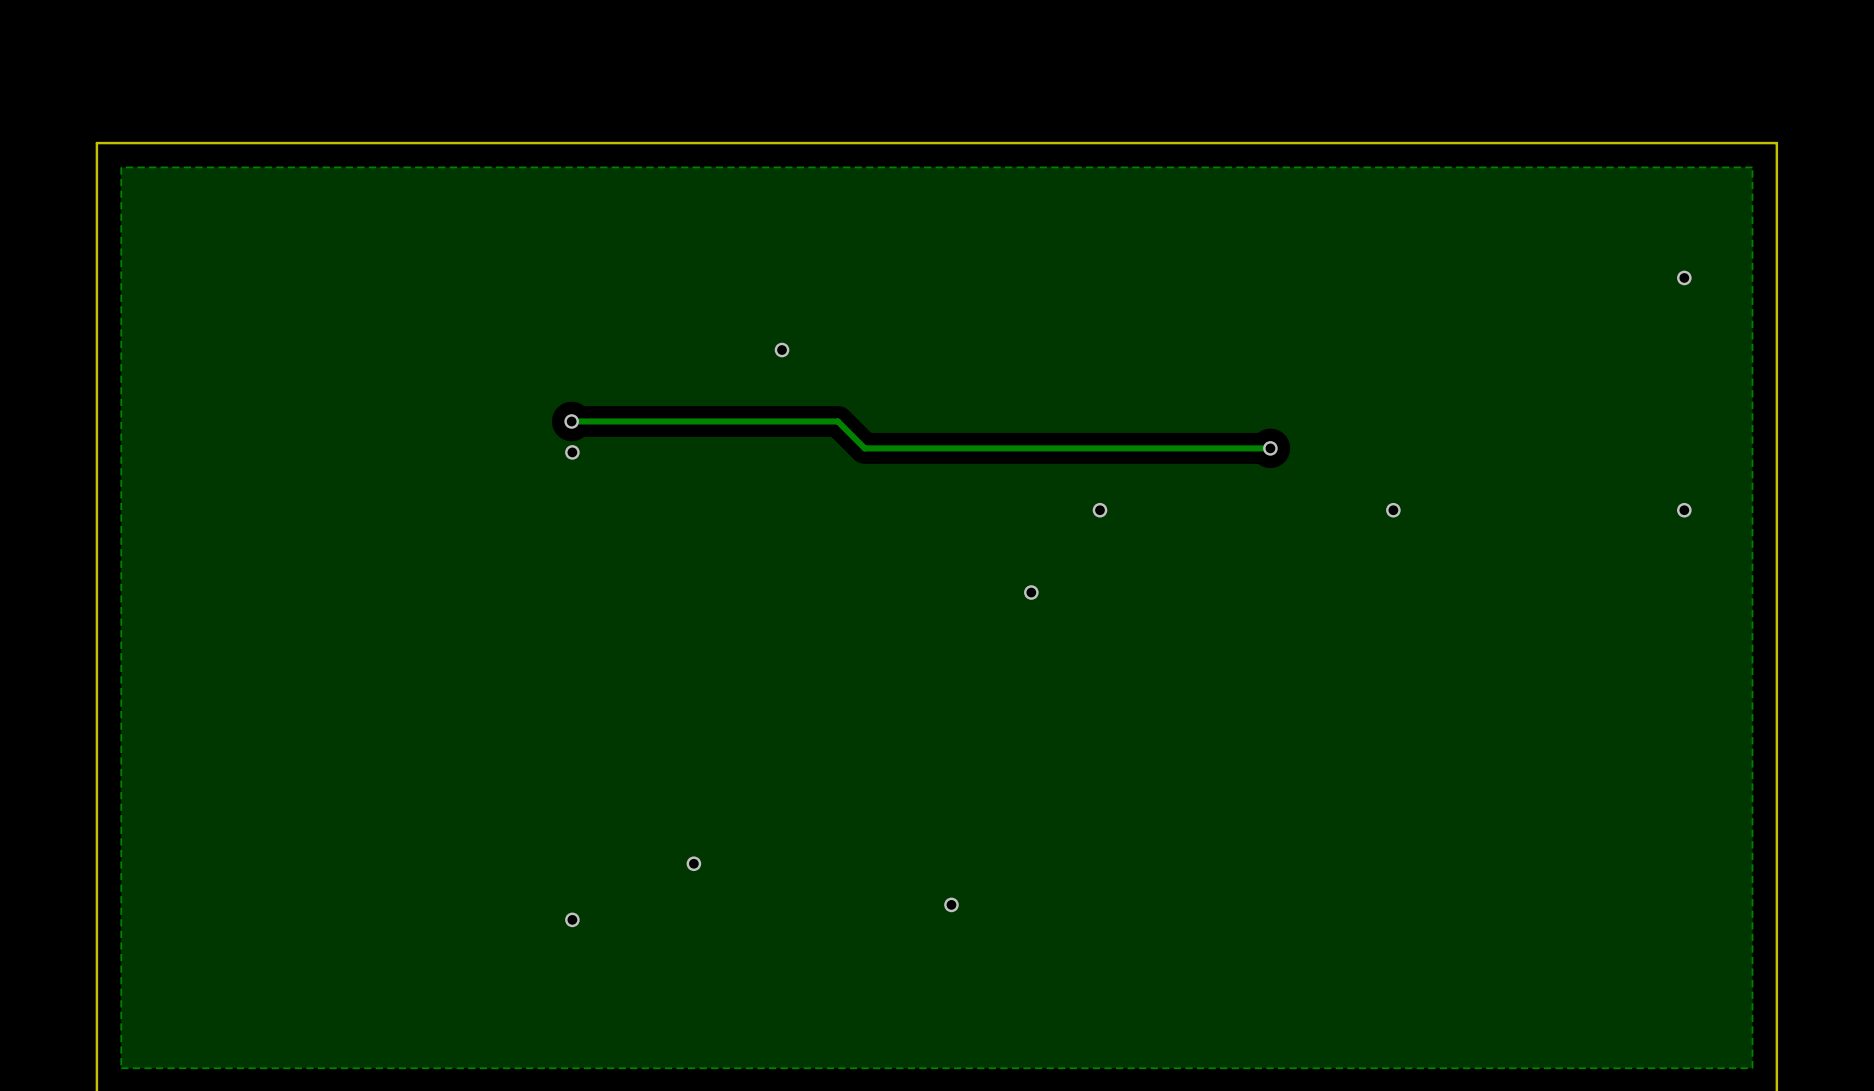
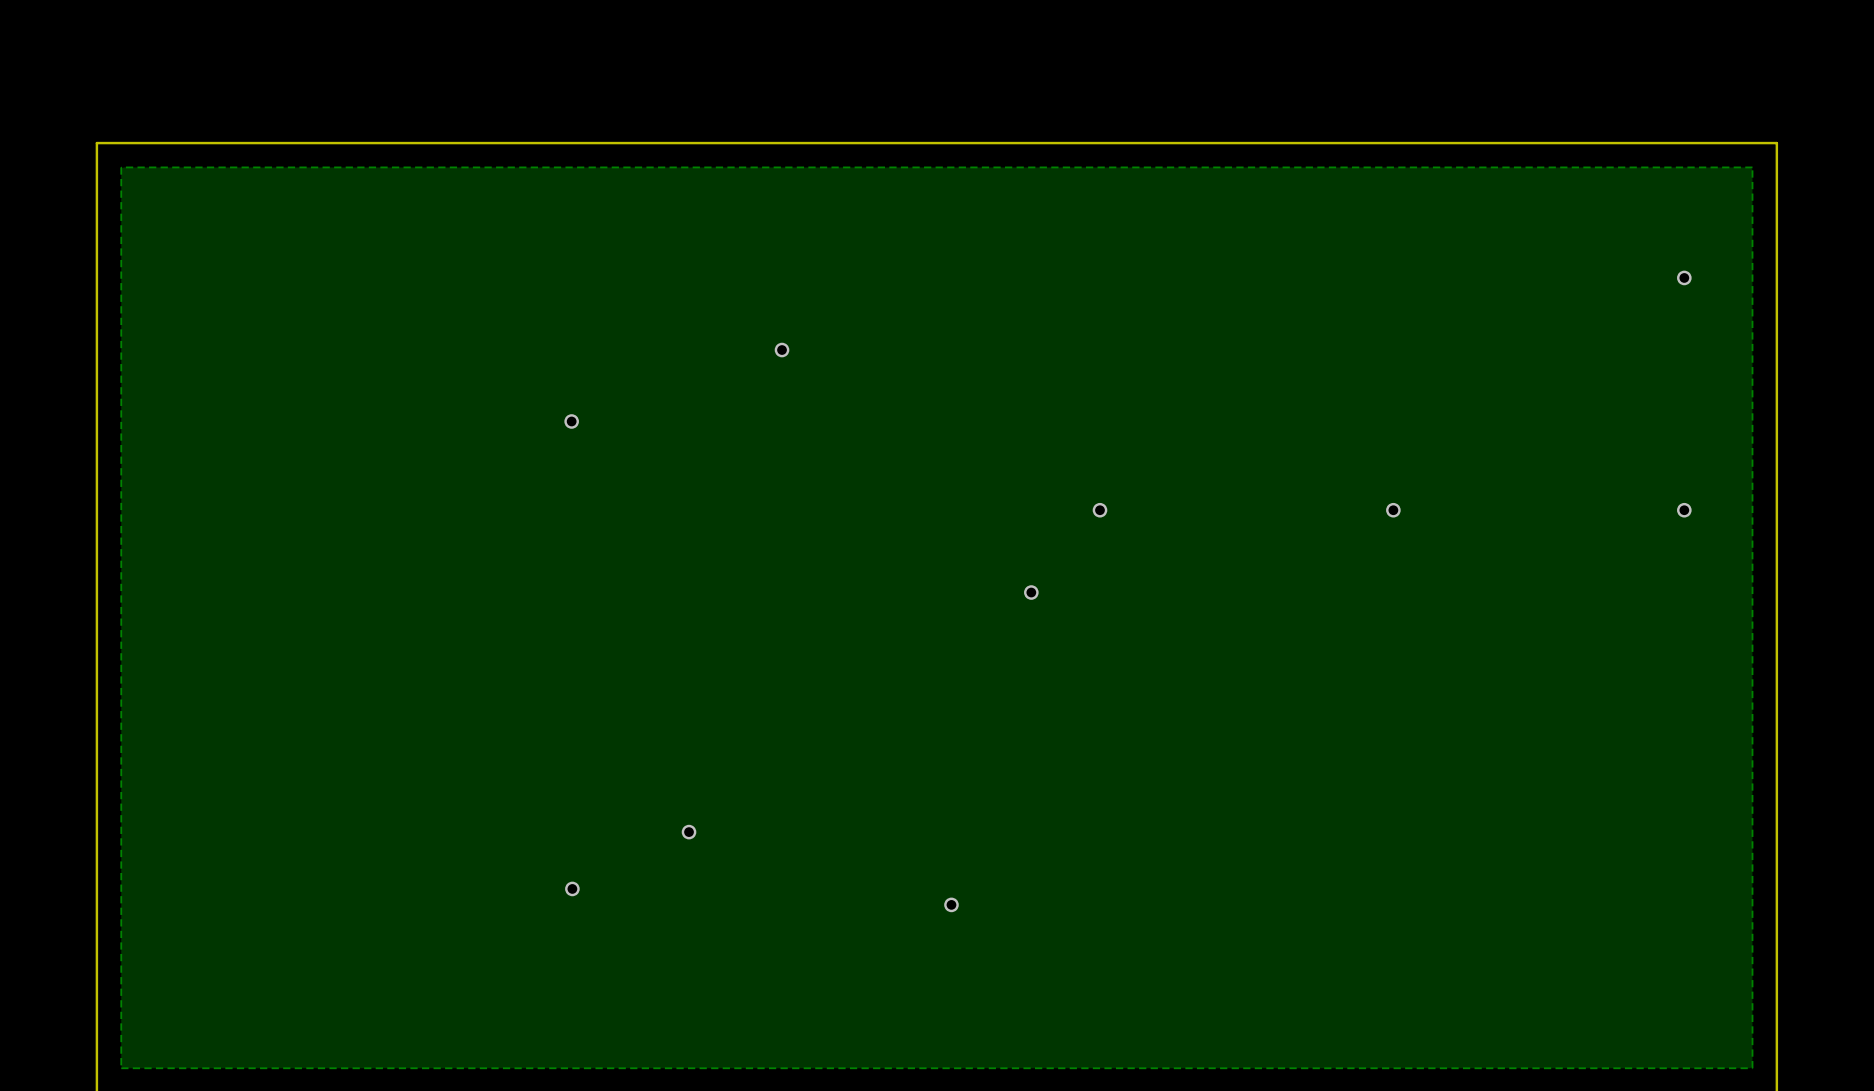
track: (571, 421) (837, 421) (864, 448) (1270, 448) -> none
via: (1270, 448) -> none
via: (572, 452) -> none
via position: (693, 863) -> (689, 832)
via position: (572, 919) -> (572, 888)

